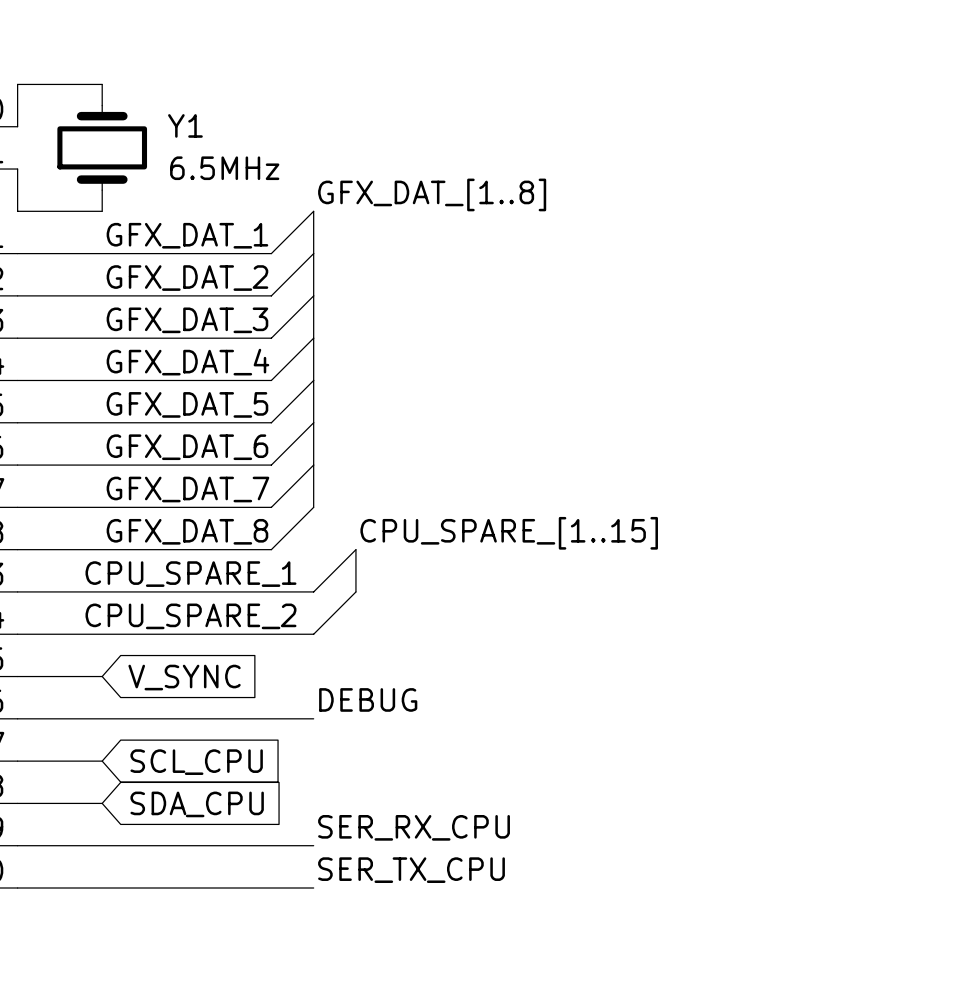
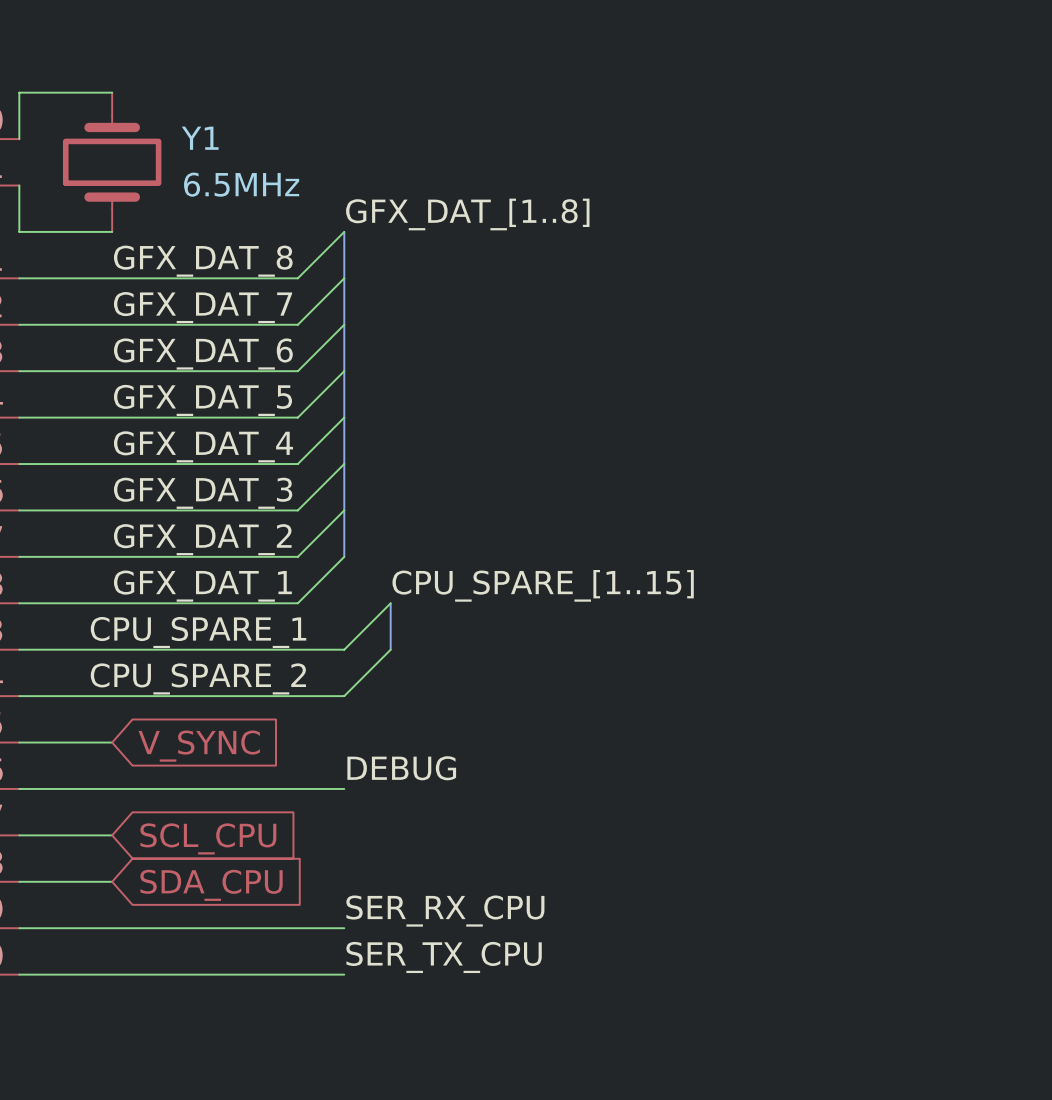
label: GFX_DAT_1 (187, 235) -> GFX_DAT_8 (203, 261)
label: GFX_DAT_2 (187, 278) -> GFX_DAT_7 (203, 307)
label: GFX_DAT_3 (187, 320) -> GFX_DAT_6 (203, 354)
label: GFX_DAT_4 (187, 362) -> GFX_DAT_5 (202, 400)
label: GFX_DAT_5 (187, 404) -> GFX_DAT_4 (203, 446)
label: GFX_DAT_6 (187, 447) -> GFX_DAT_3 (203, 493)
label: GFX_DAT_7 (187, 489) -> GFX_DAT_2 (202, 539)
label: GFX_DAT_8 (187, 531) -> GFX_DAT_1 (202, 586)

